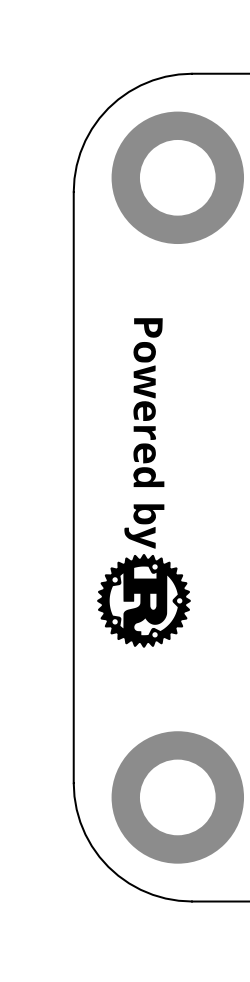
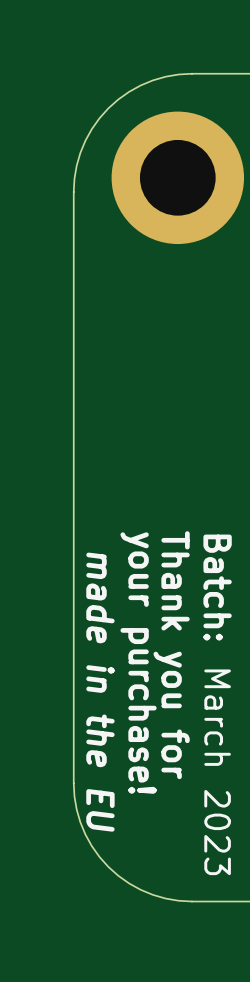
drawing: [97, 318, 191, 648] -> none
text: none -> Batch: (217, 587)
text: none -> Thank you for (171, 655)
text: none -> your purchase! (138, 663)
text: none -> made in the EU (100, 692)
text: none -> March 2023 (217, 772)
part: (177, 797) -> none

